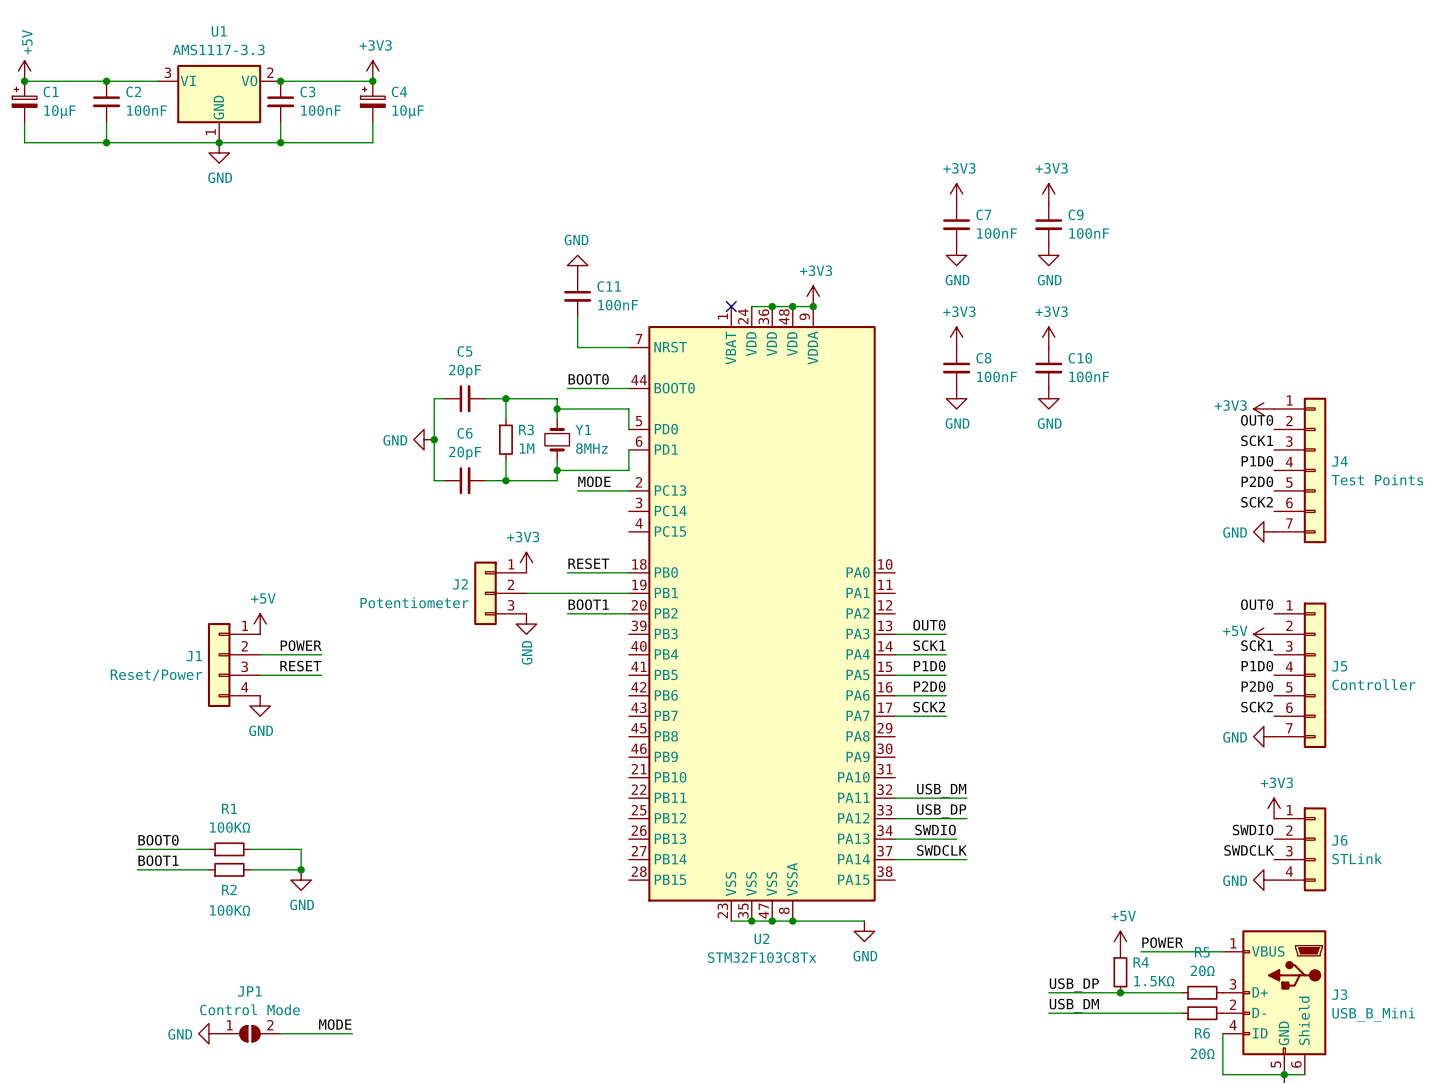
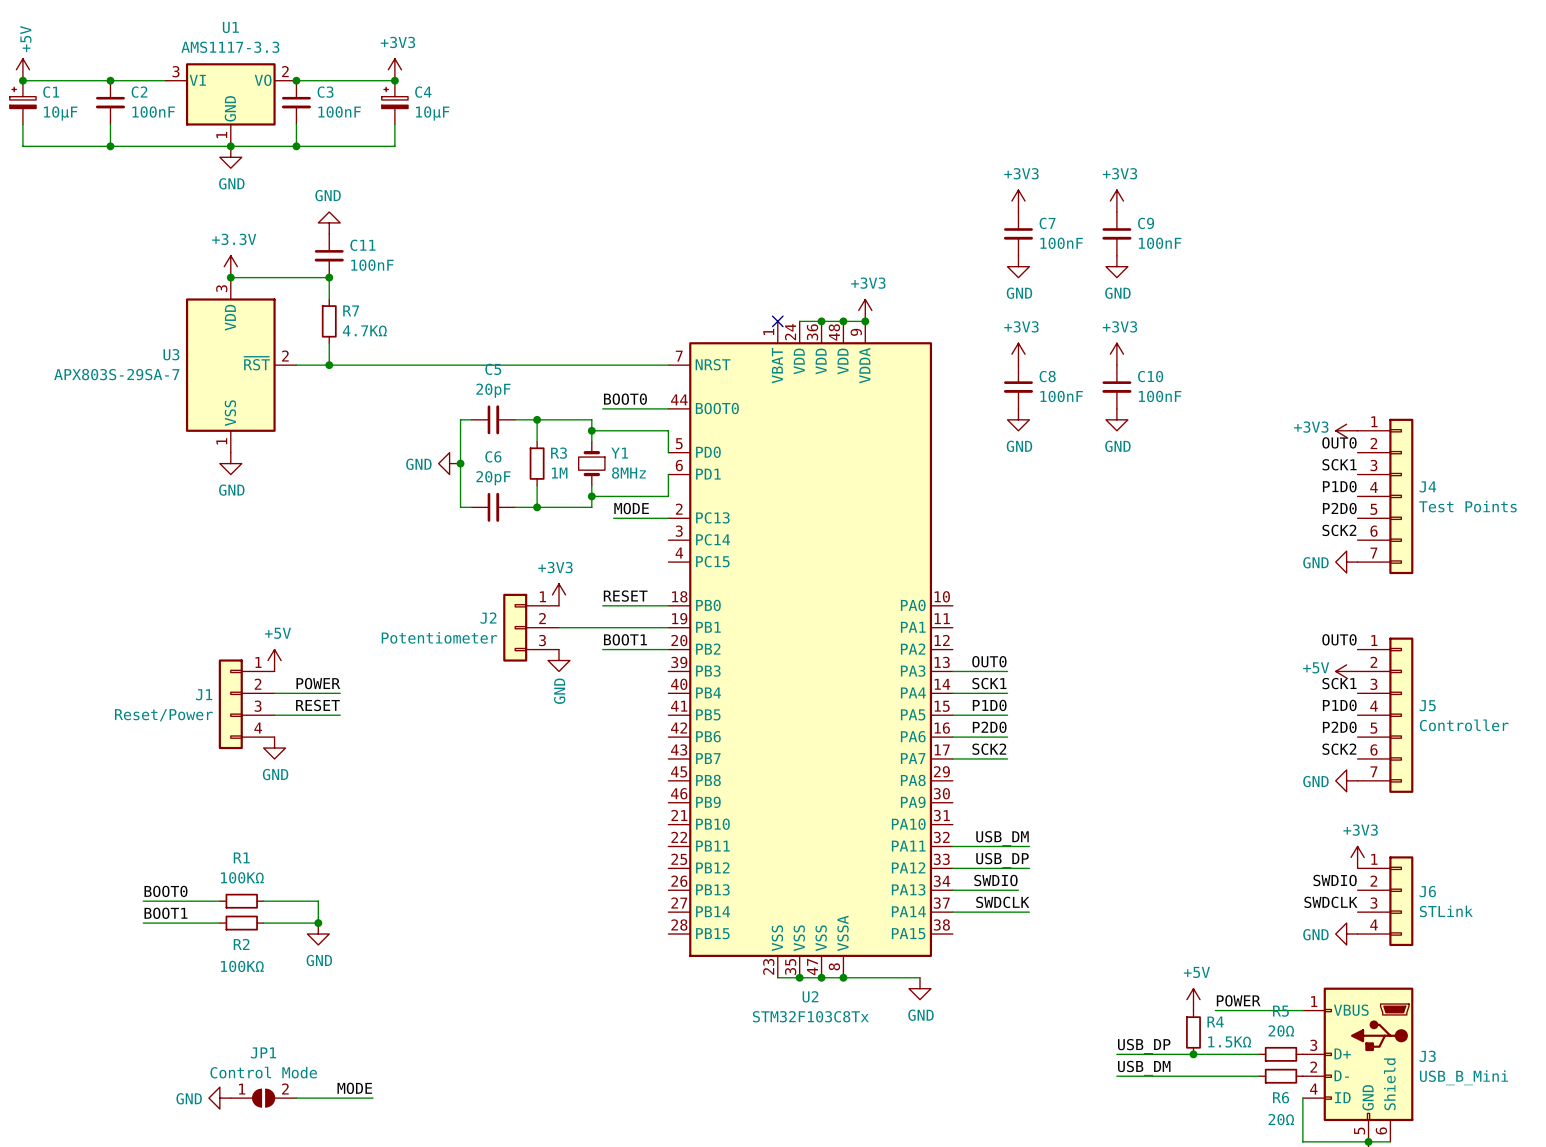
power symbol: none -> GND (329, 222)
power symbol: none -> +3.3V (230, 266)
wire: none -> (230, 277) (329, 277) (329, 299)
junction: none -> (230, 277)
junction: none -> (329, 277)
power symbol: GND (577, 265) -> none
C11 position: (577, 296) -> (329, 255)
R7: none -> 4.7KΩ (329, 321)
wire: (577, 316) (577, 347) -> (296, 365) (613, 365)
wire: none -> (329, 343) (329, 365)
U3: none -> APX803S-29SA-7 (241, 365)
junction: none -> (329, 365)
power symbol: none -> GND (230, 463)

